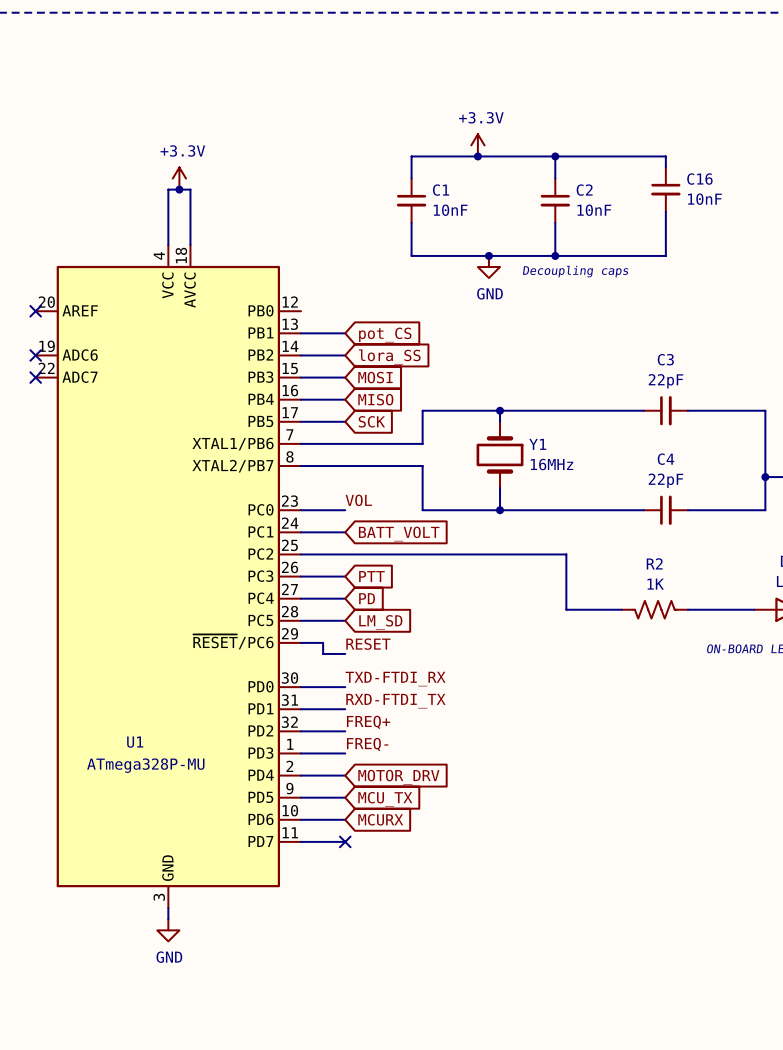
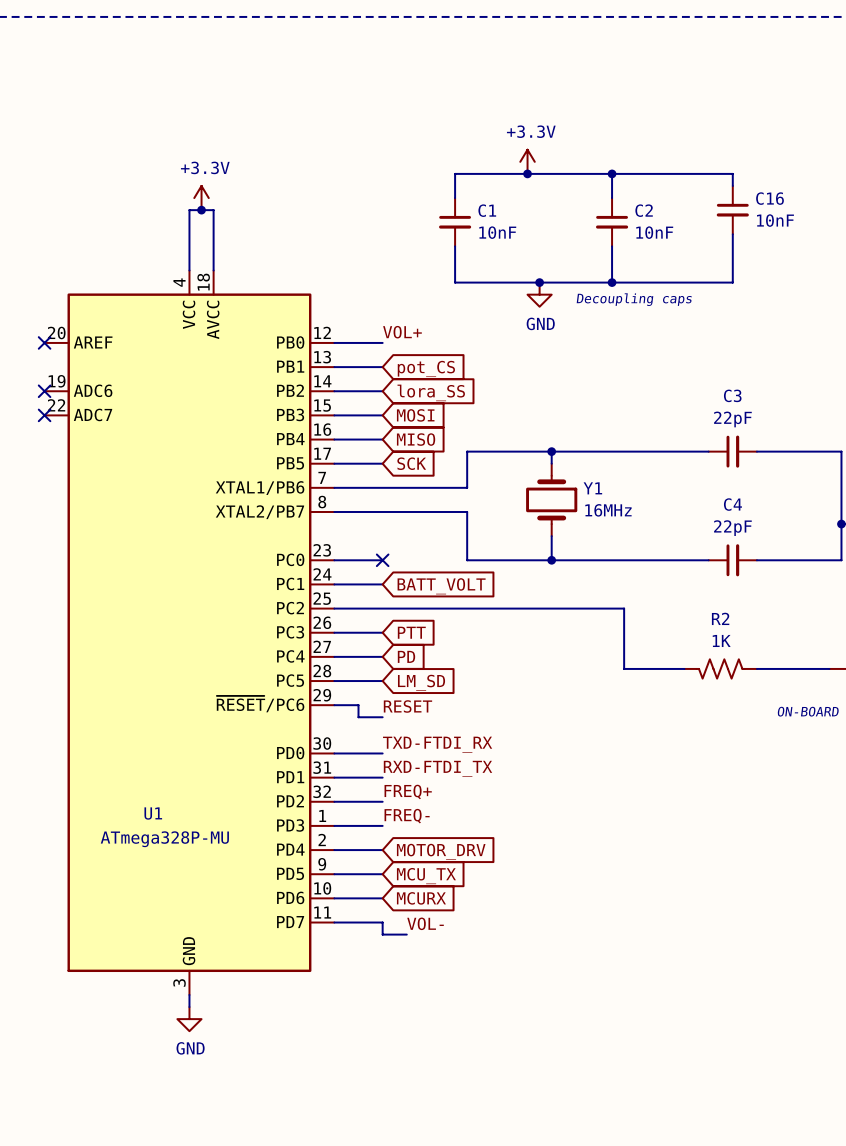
label: none -> VOL+ (402, 332)
wire: none -> (334, 342) (382, 342)
label: VOL (358, 500) -> none
no-connect mark: none -> (382, 560)
wire: none -> (382, 922) (382, 934) (406, 934)
no-connect mark: (345, 841) -> none
label: none -> VOL- (425, 923)

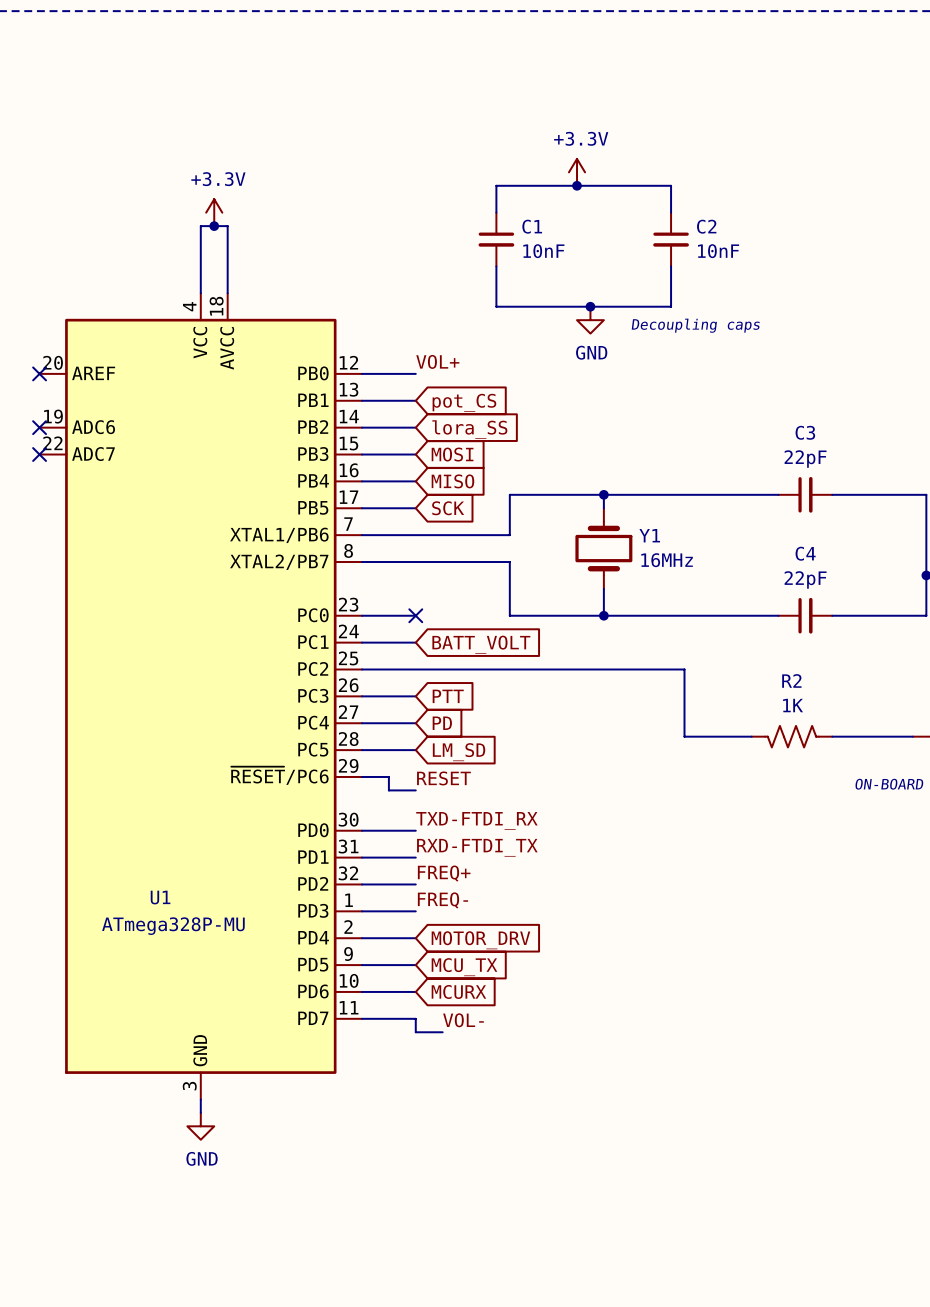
wire: (612, 173) (732, 173) (732, 185) -> none
junction: (612, 173) -> none
C16: 10nF (732, 210) -> none
wire: (732, 234) (732, 282) (612, 282) -> none
junction: (612, 282) -> none

